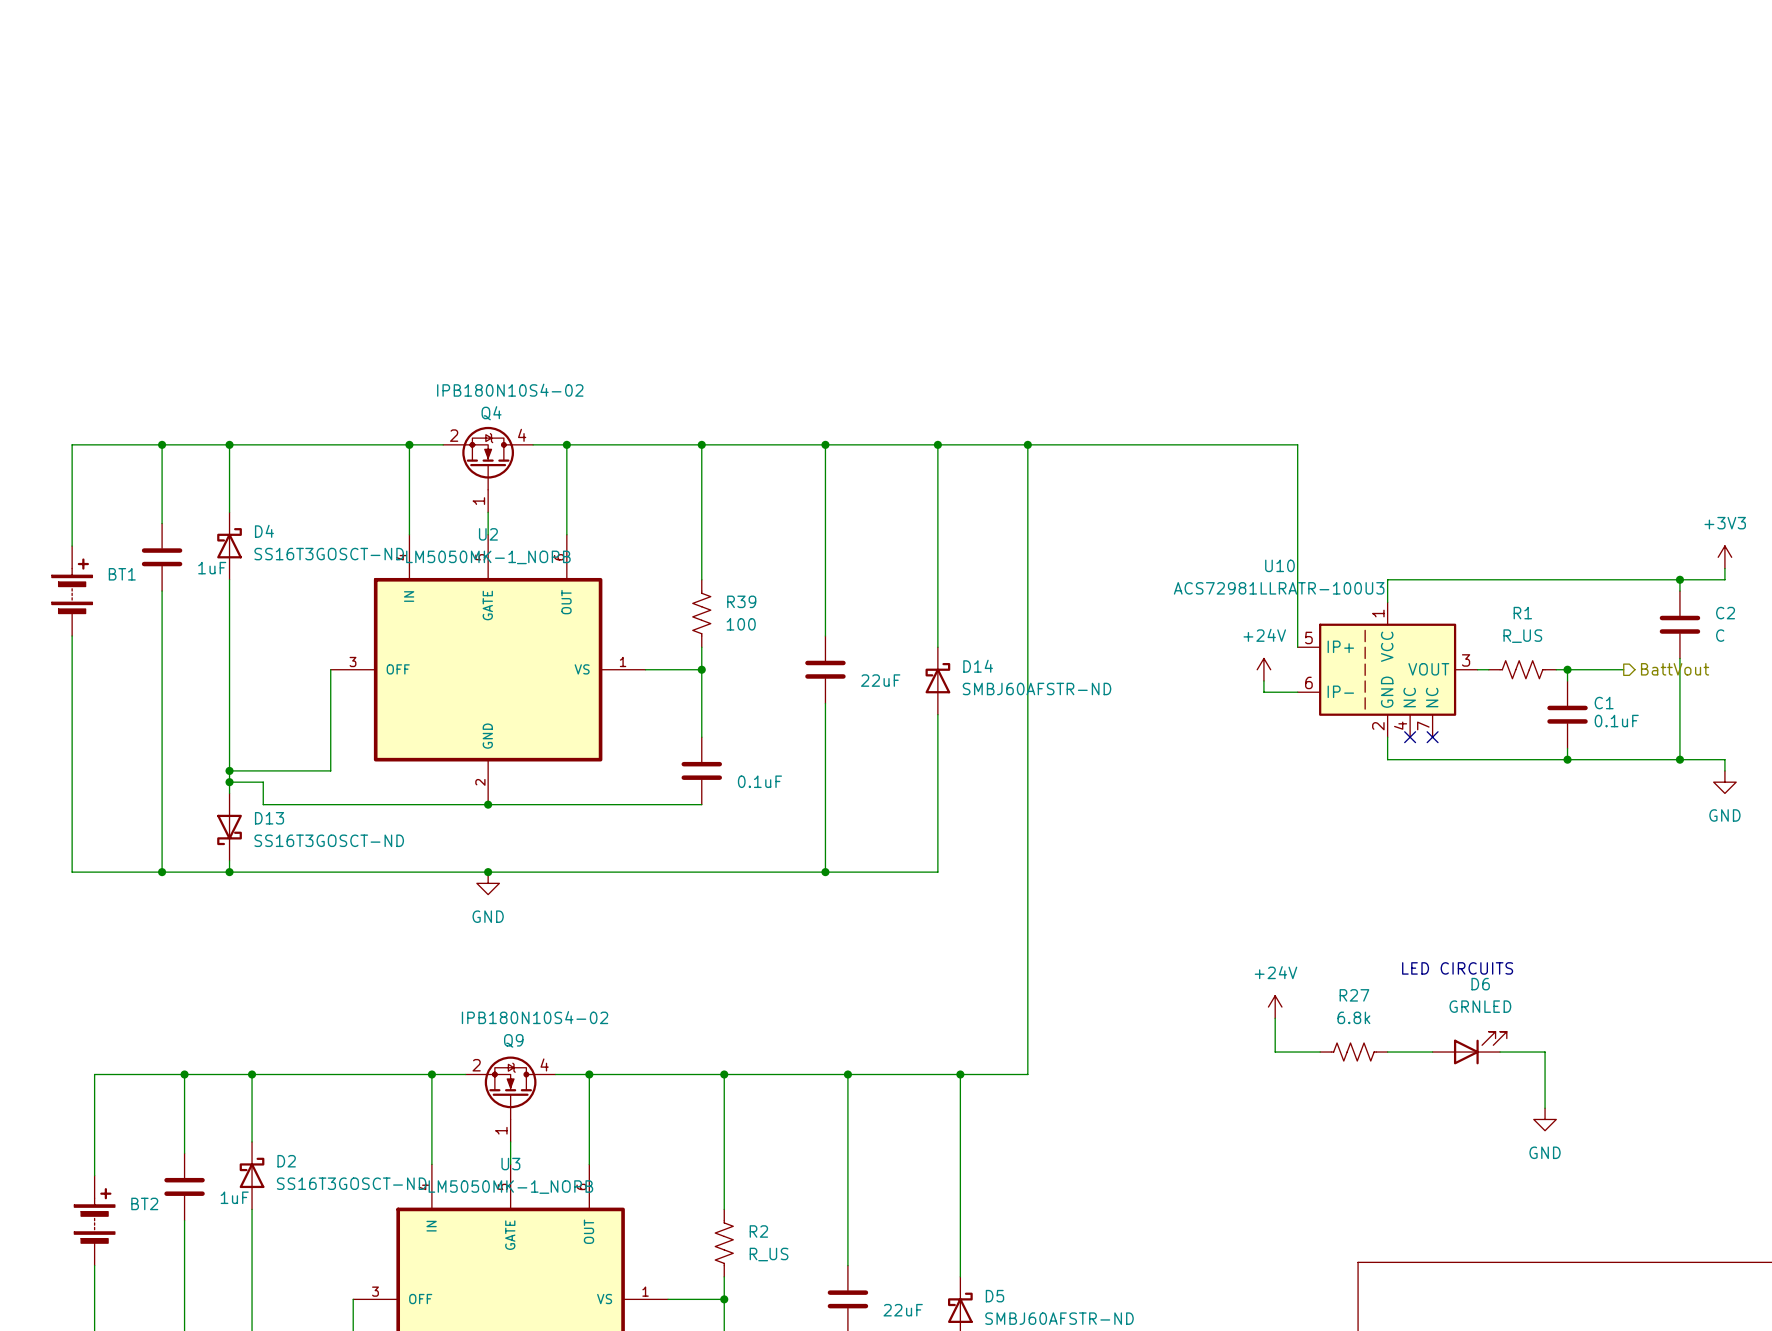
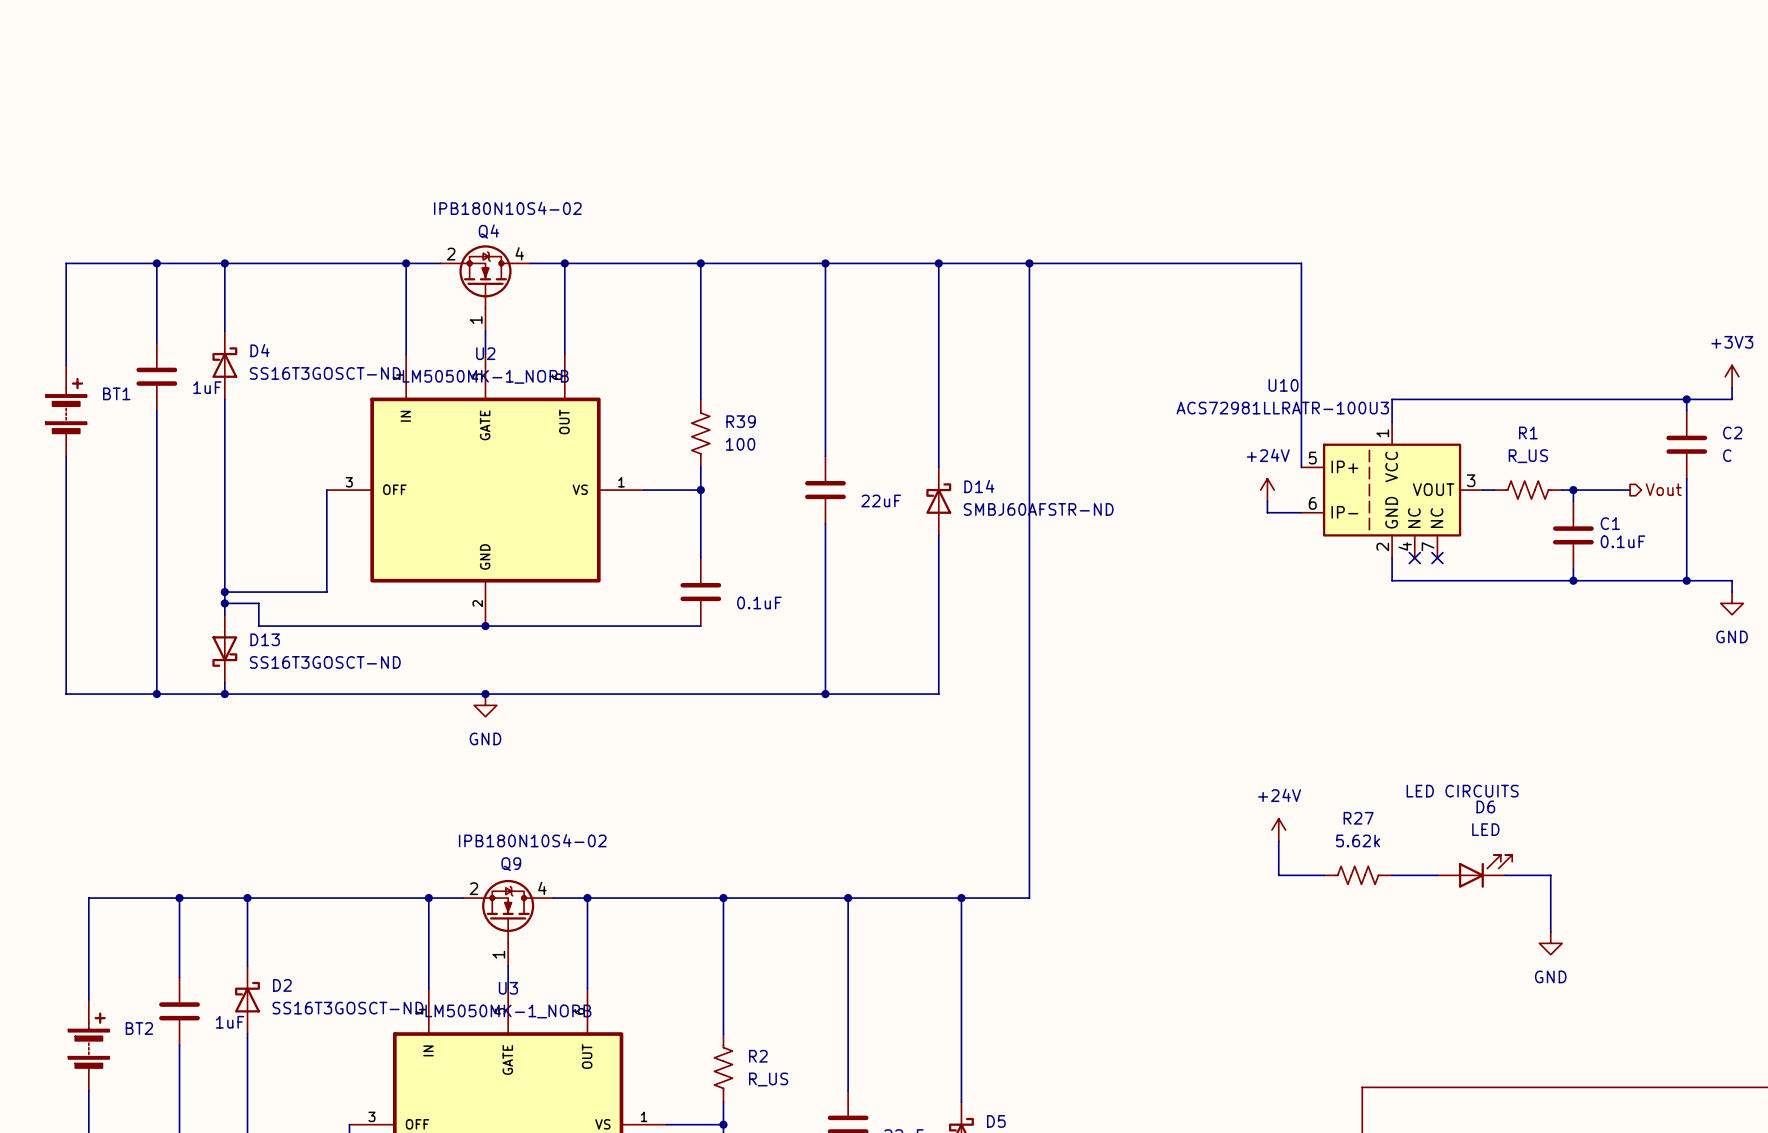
hierarchical label: BattVout (1675, 669) -> Vout (1663, 489)
D6 value: GRNLED (1480, 1006) -> LED (1485, 829)
R27 value: 6.8k (1353, 1017) -> 5.62k (1358, 840)

